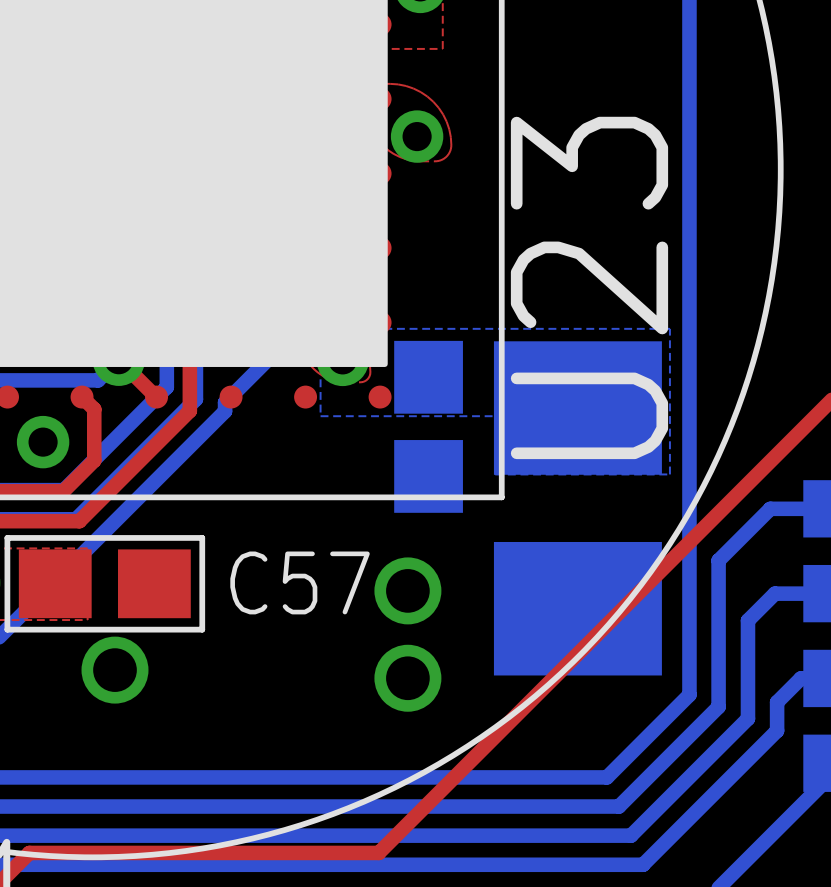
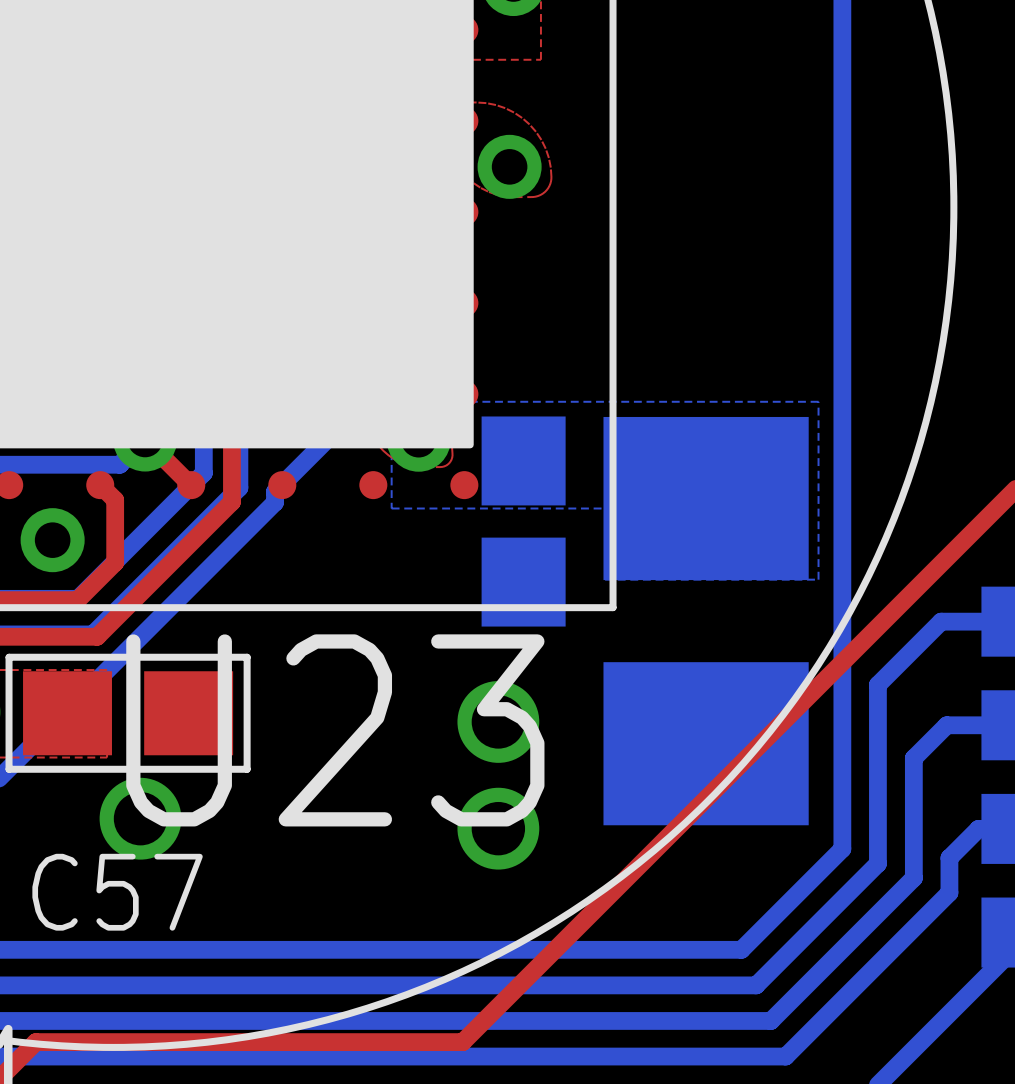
U23 name rotation: 0° (589, 287) -> 90° clockwise (335, 730)
U23 name position: U23 (589, 287) -> U23 (335, 730)
C57 name position: C57 (300, 582) -> C57 (117, 892)

